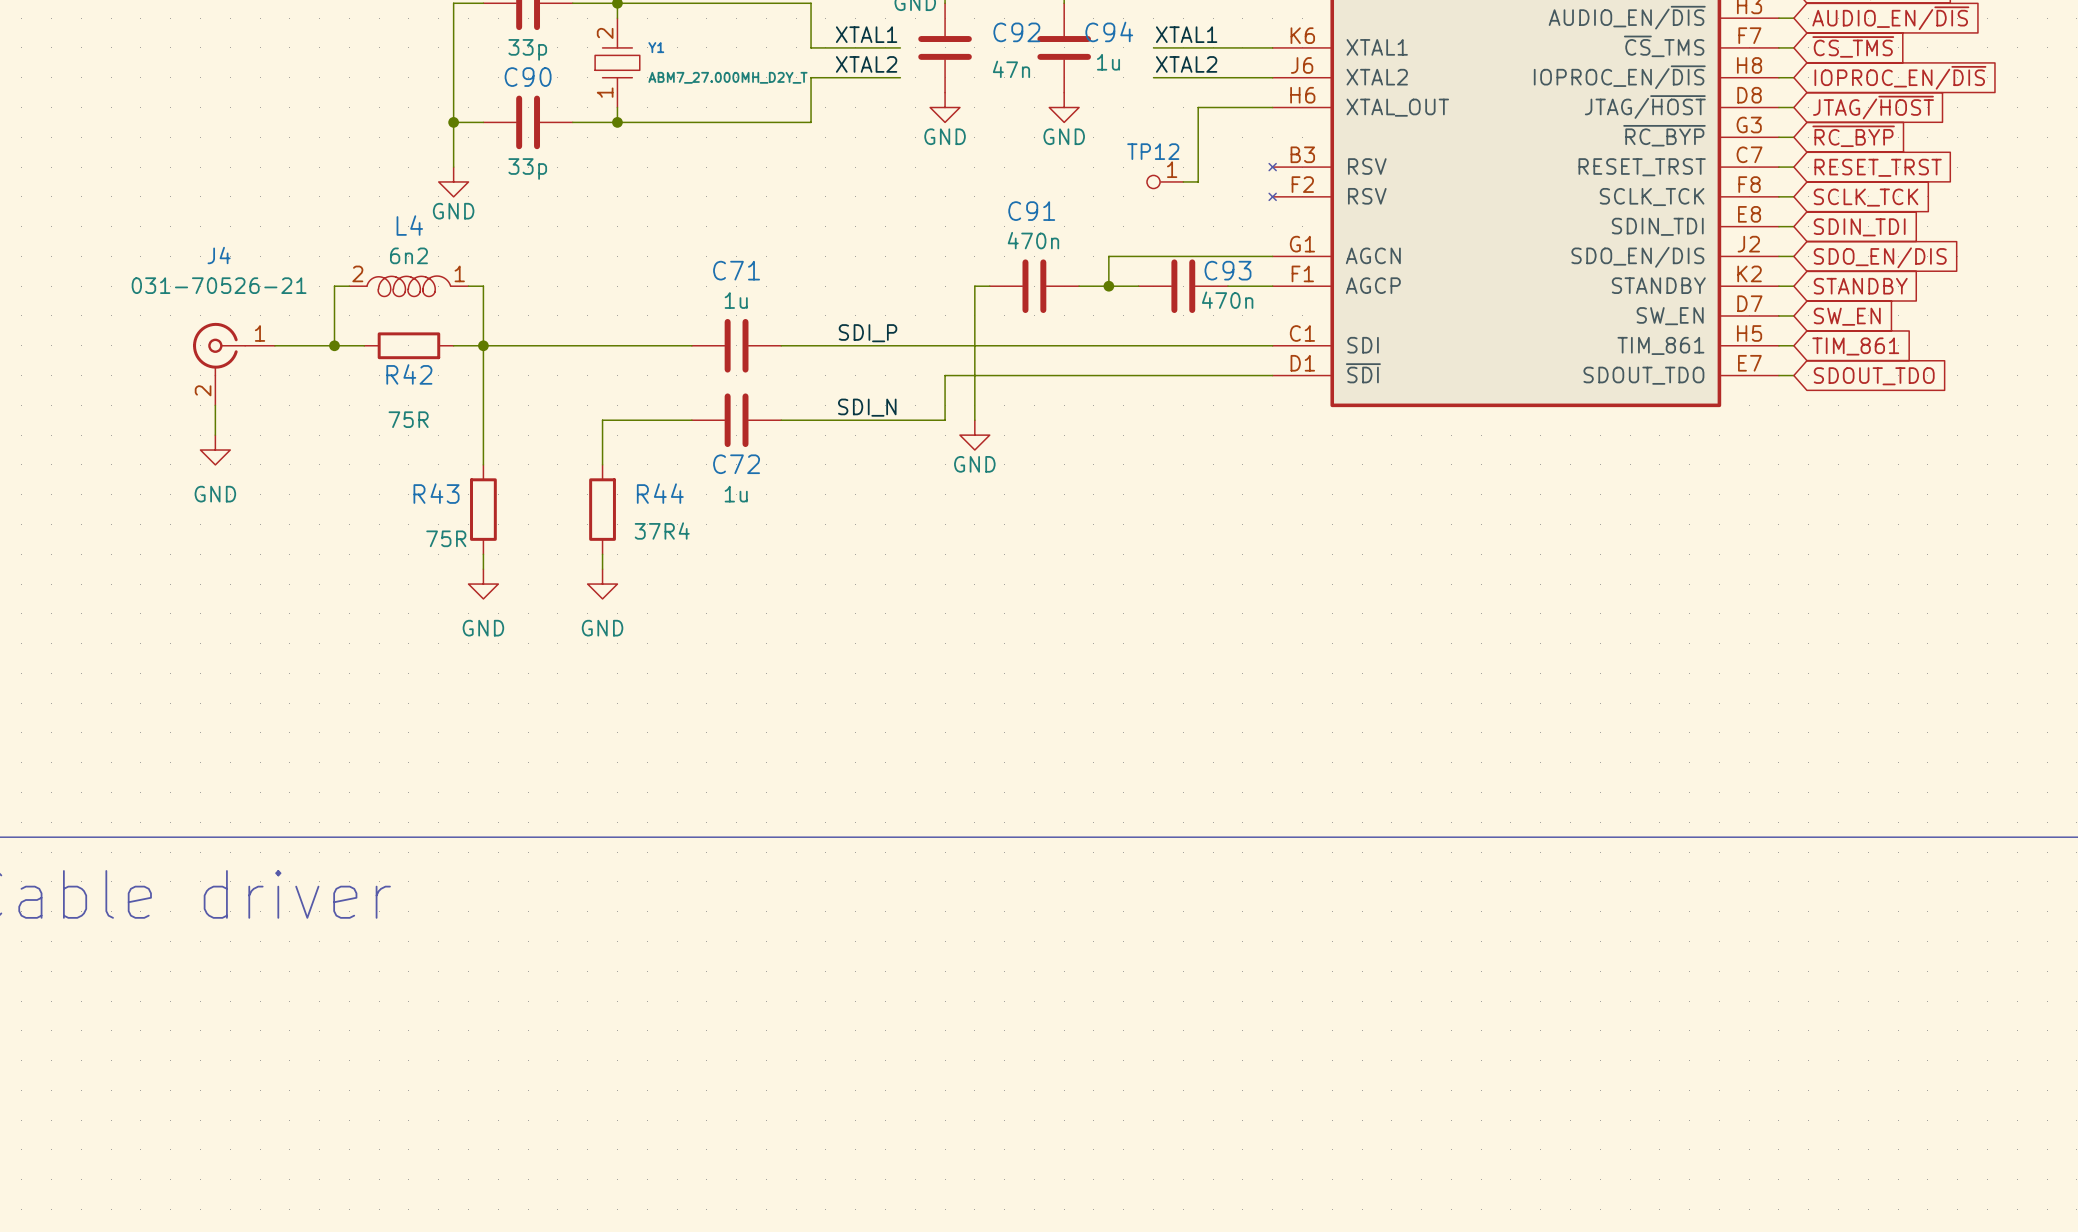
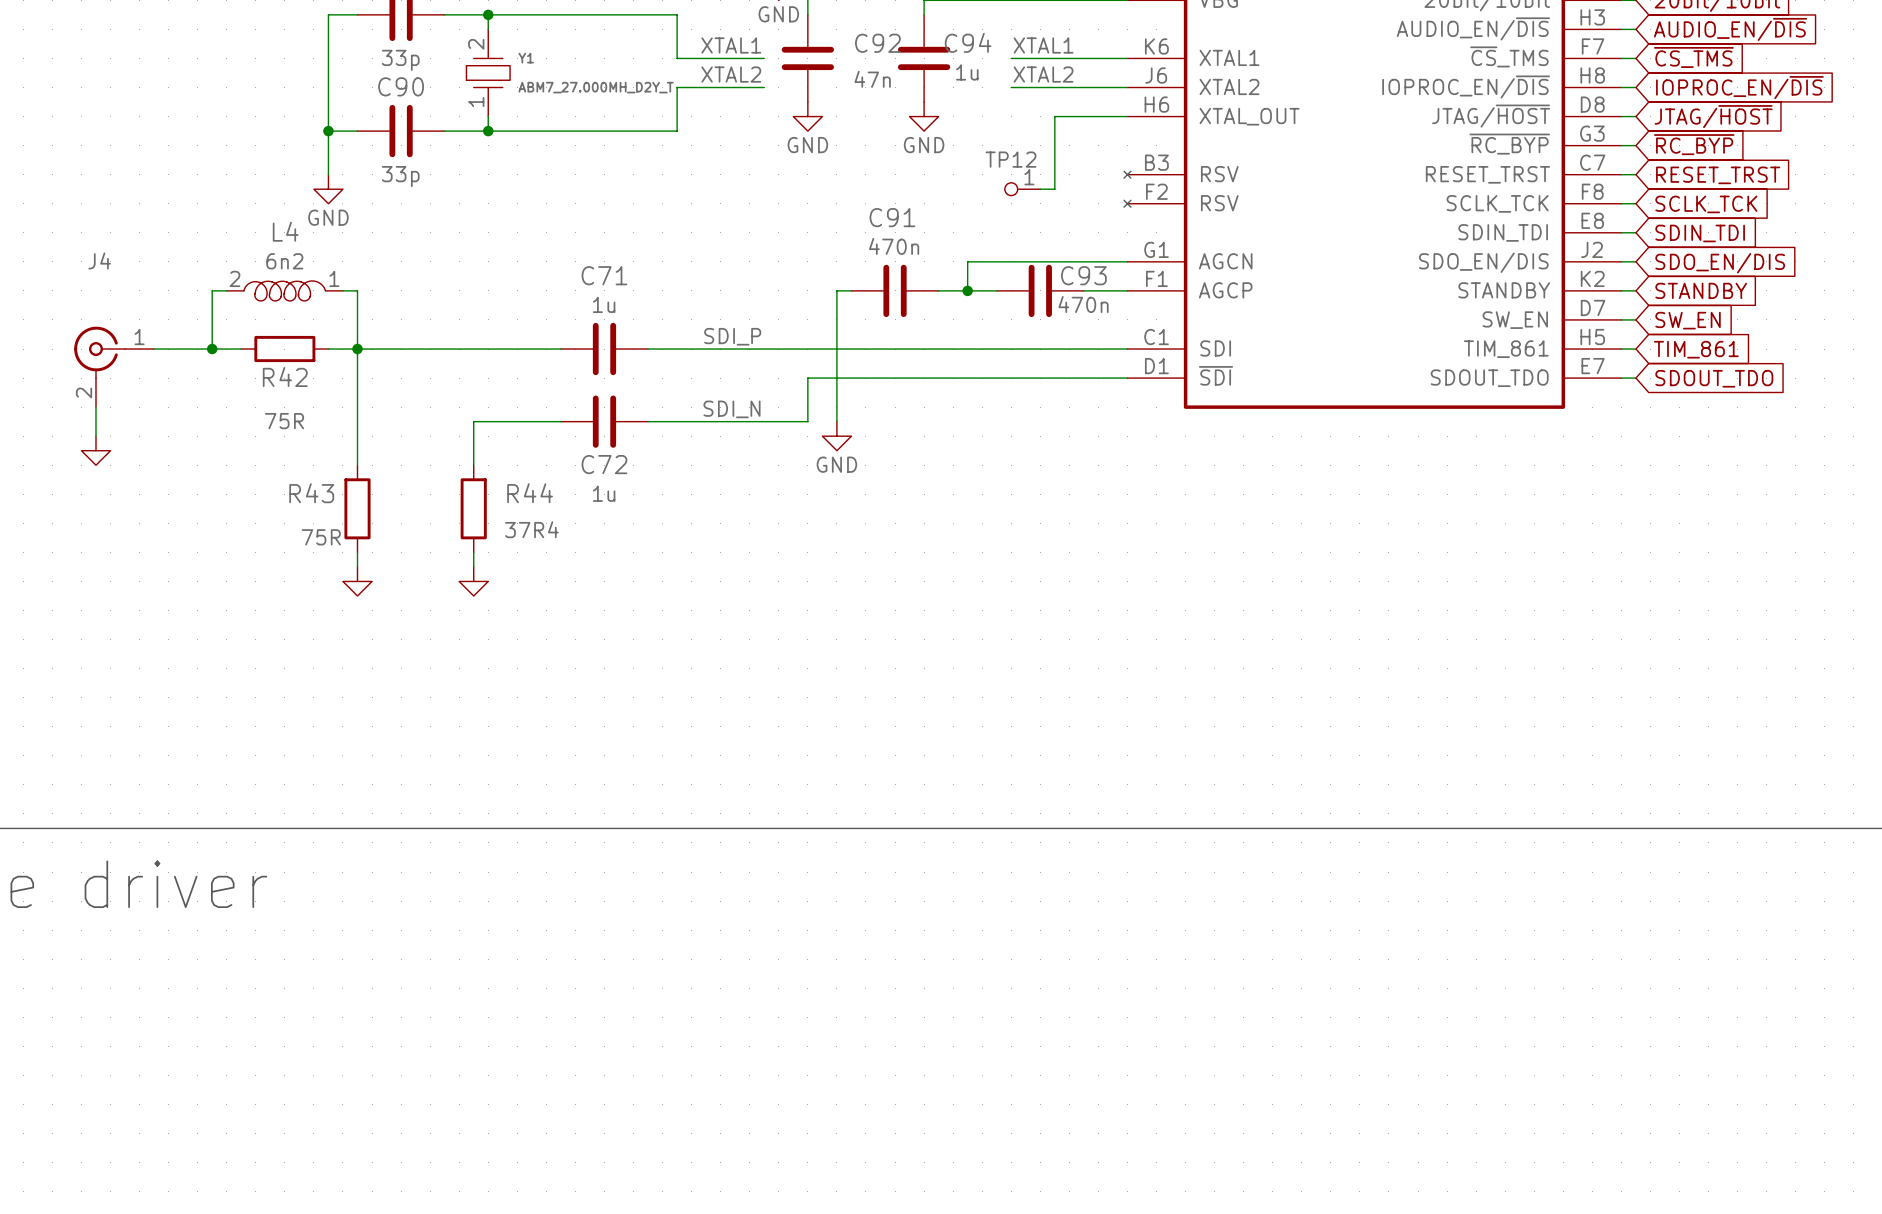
J4 value: 031-70526-21 (219, 285) -> none
power symbol text: GND (215, 494) -> none
power symbol text: GND (483, 628) -> none
power symbol text: GND (602, 628) -> none

